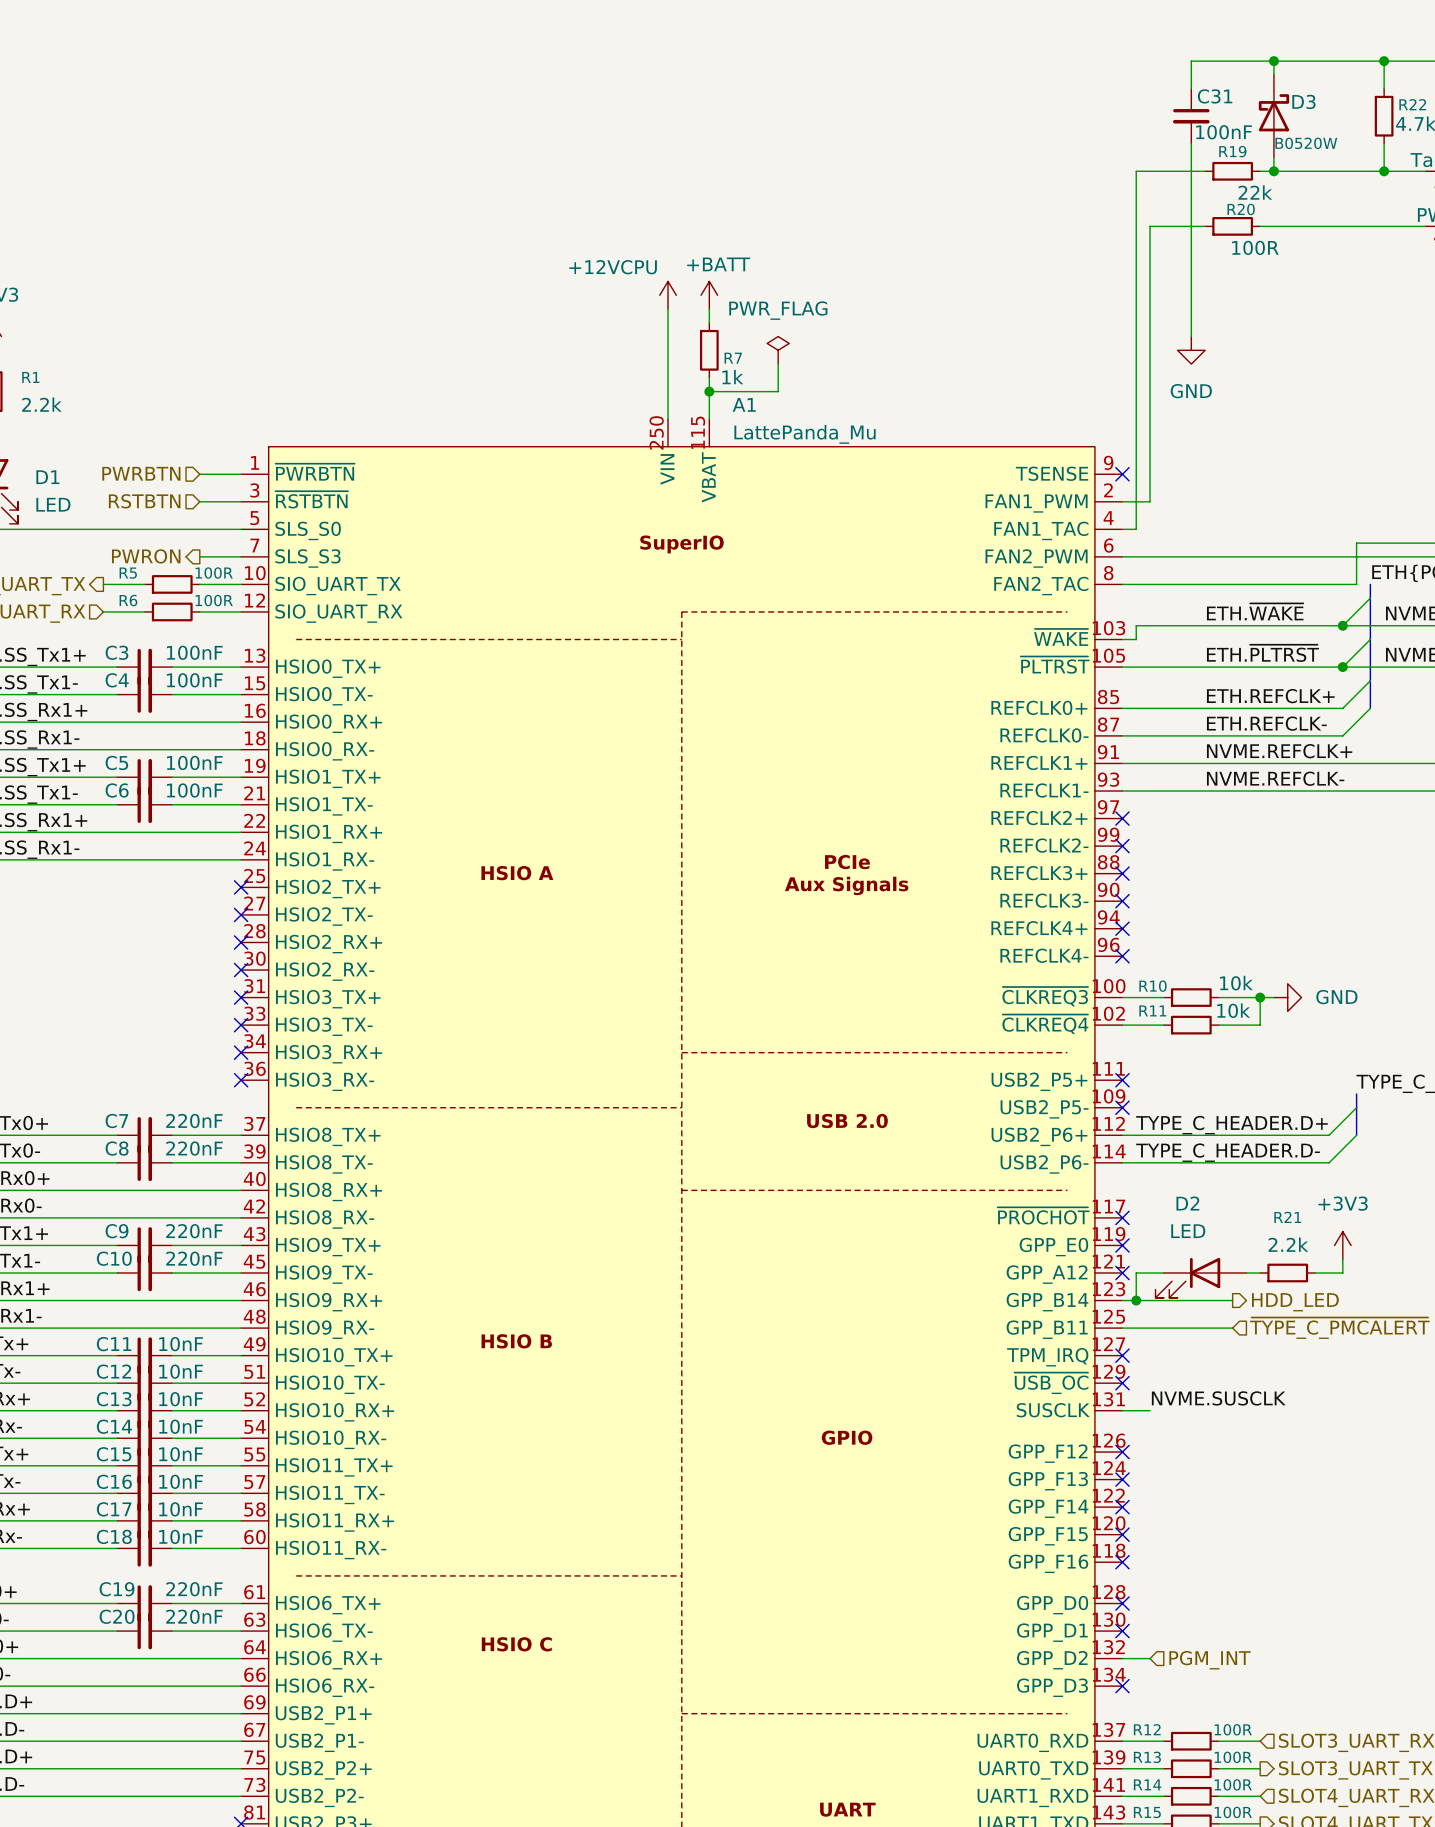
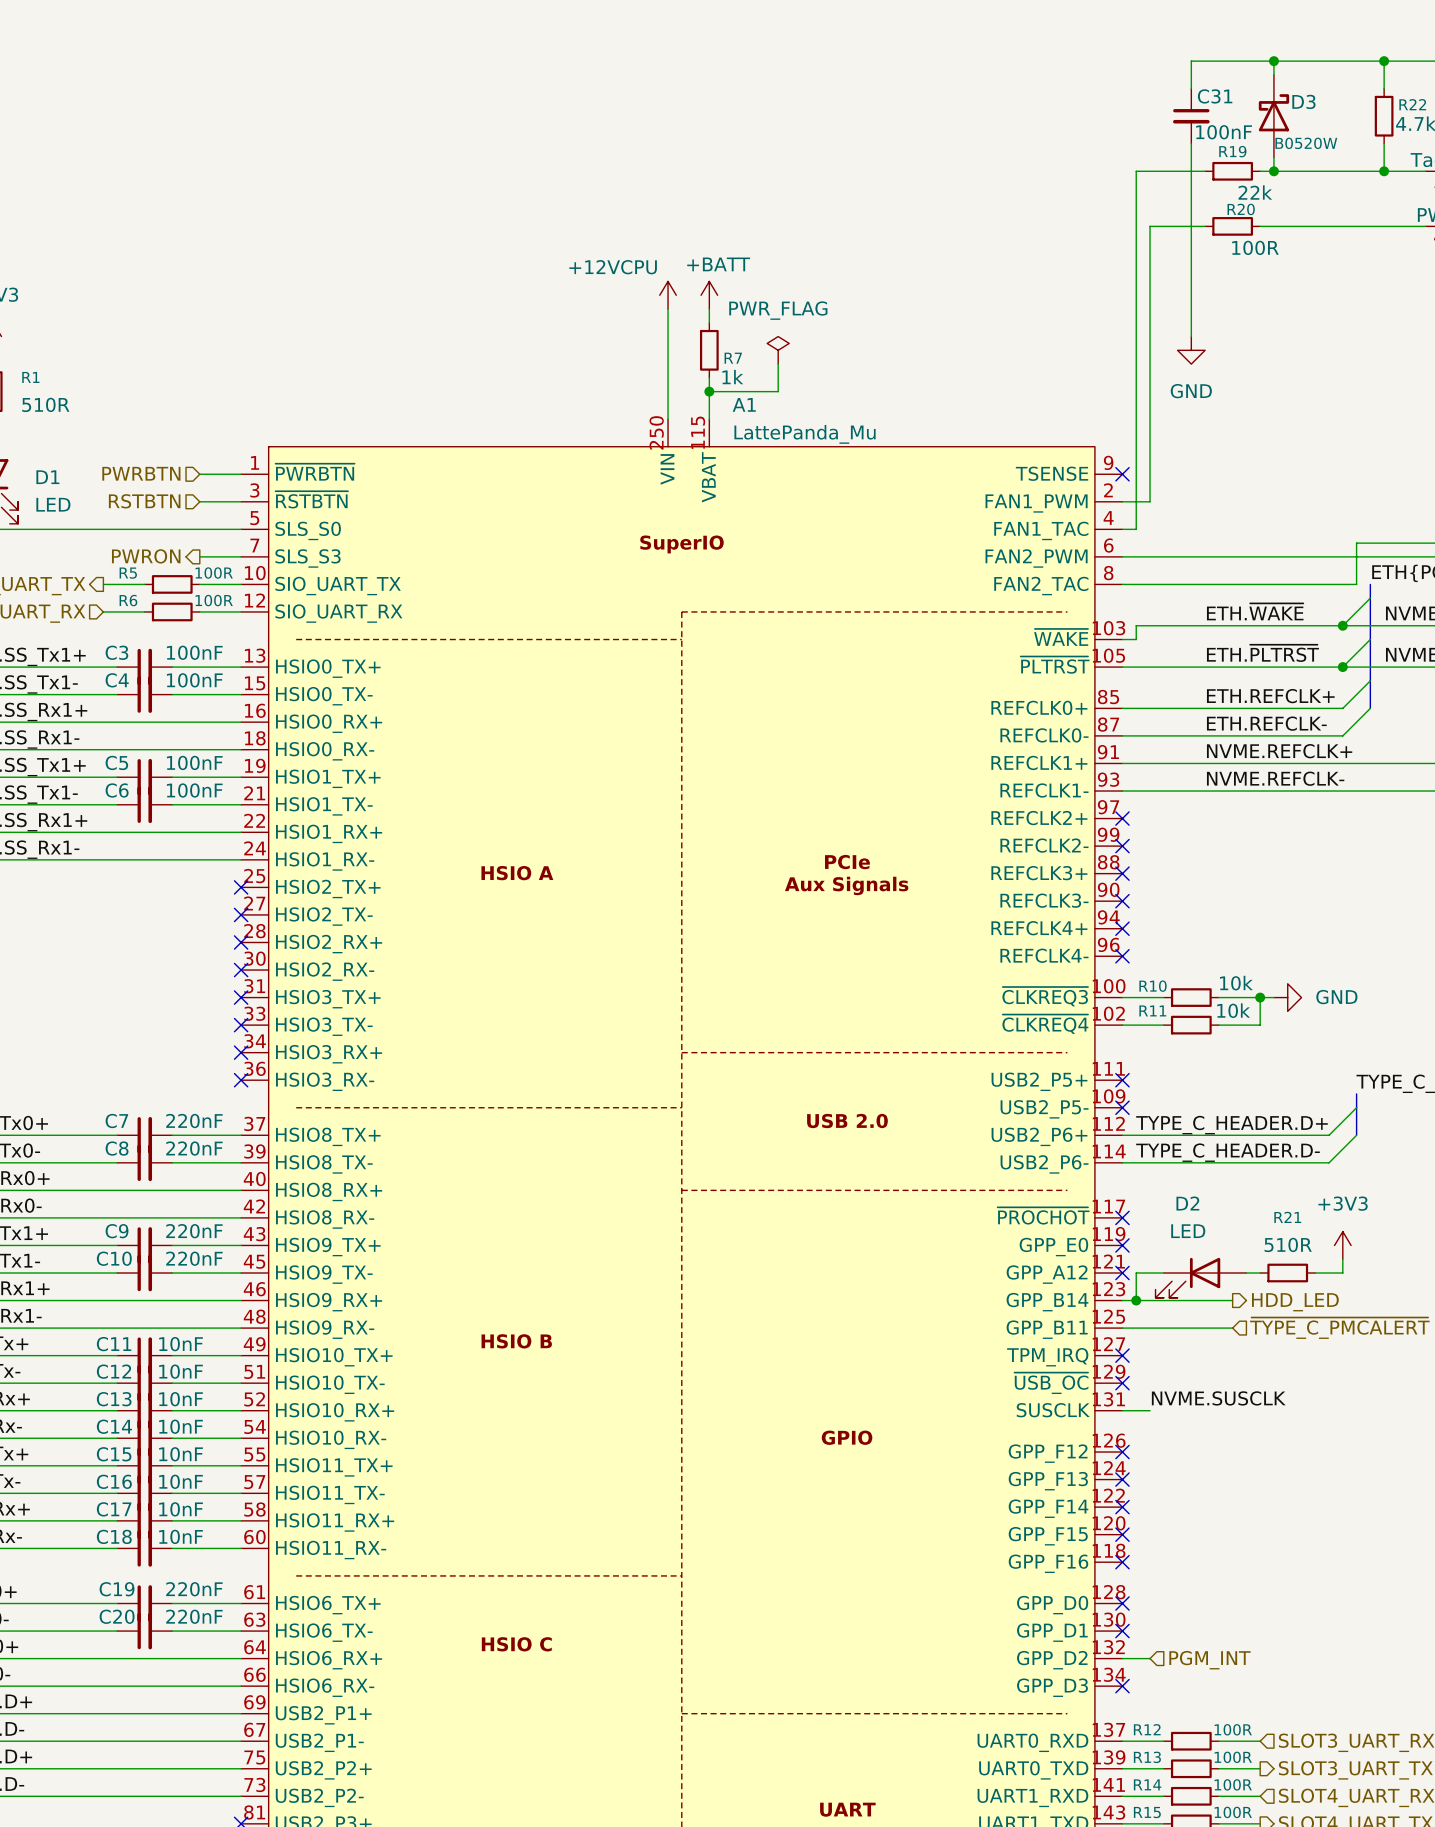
R1 value: 2.2k (41, 404) -> 510R (45, 404)
R21 value: 2.2k (1288, 1244) -> 510R (1288, 1244)

